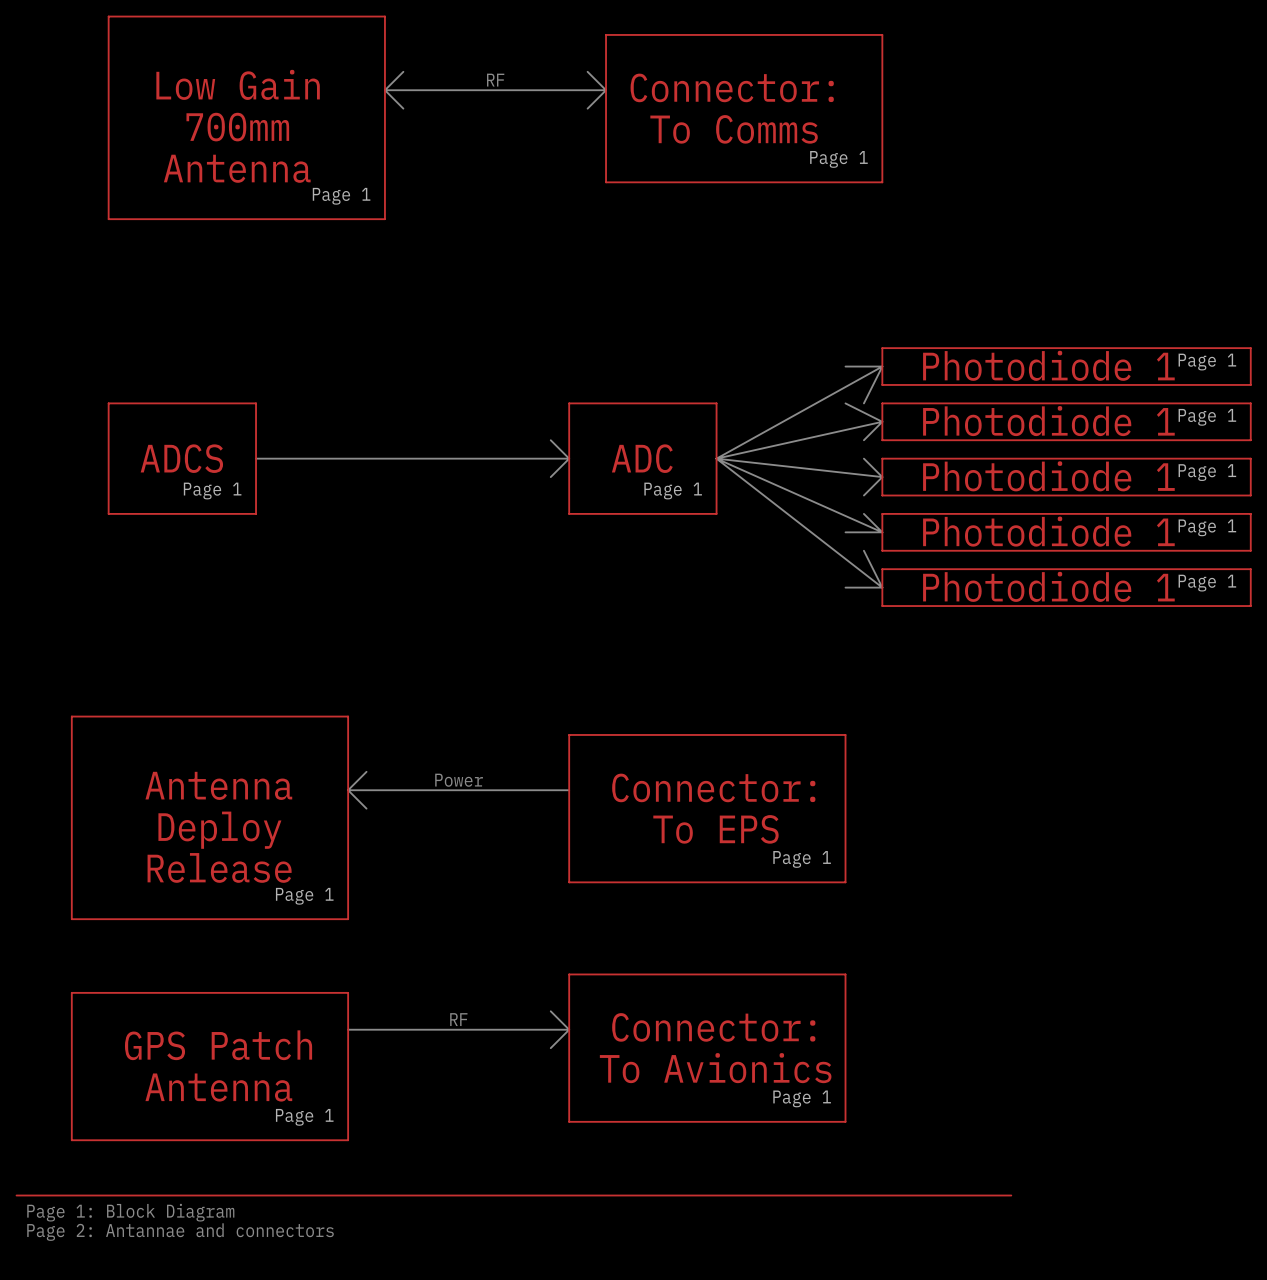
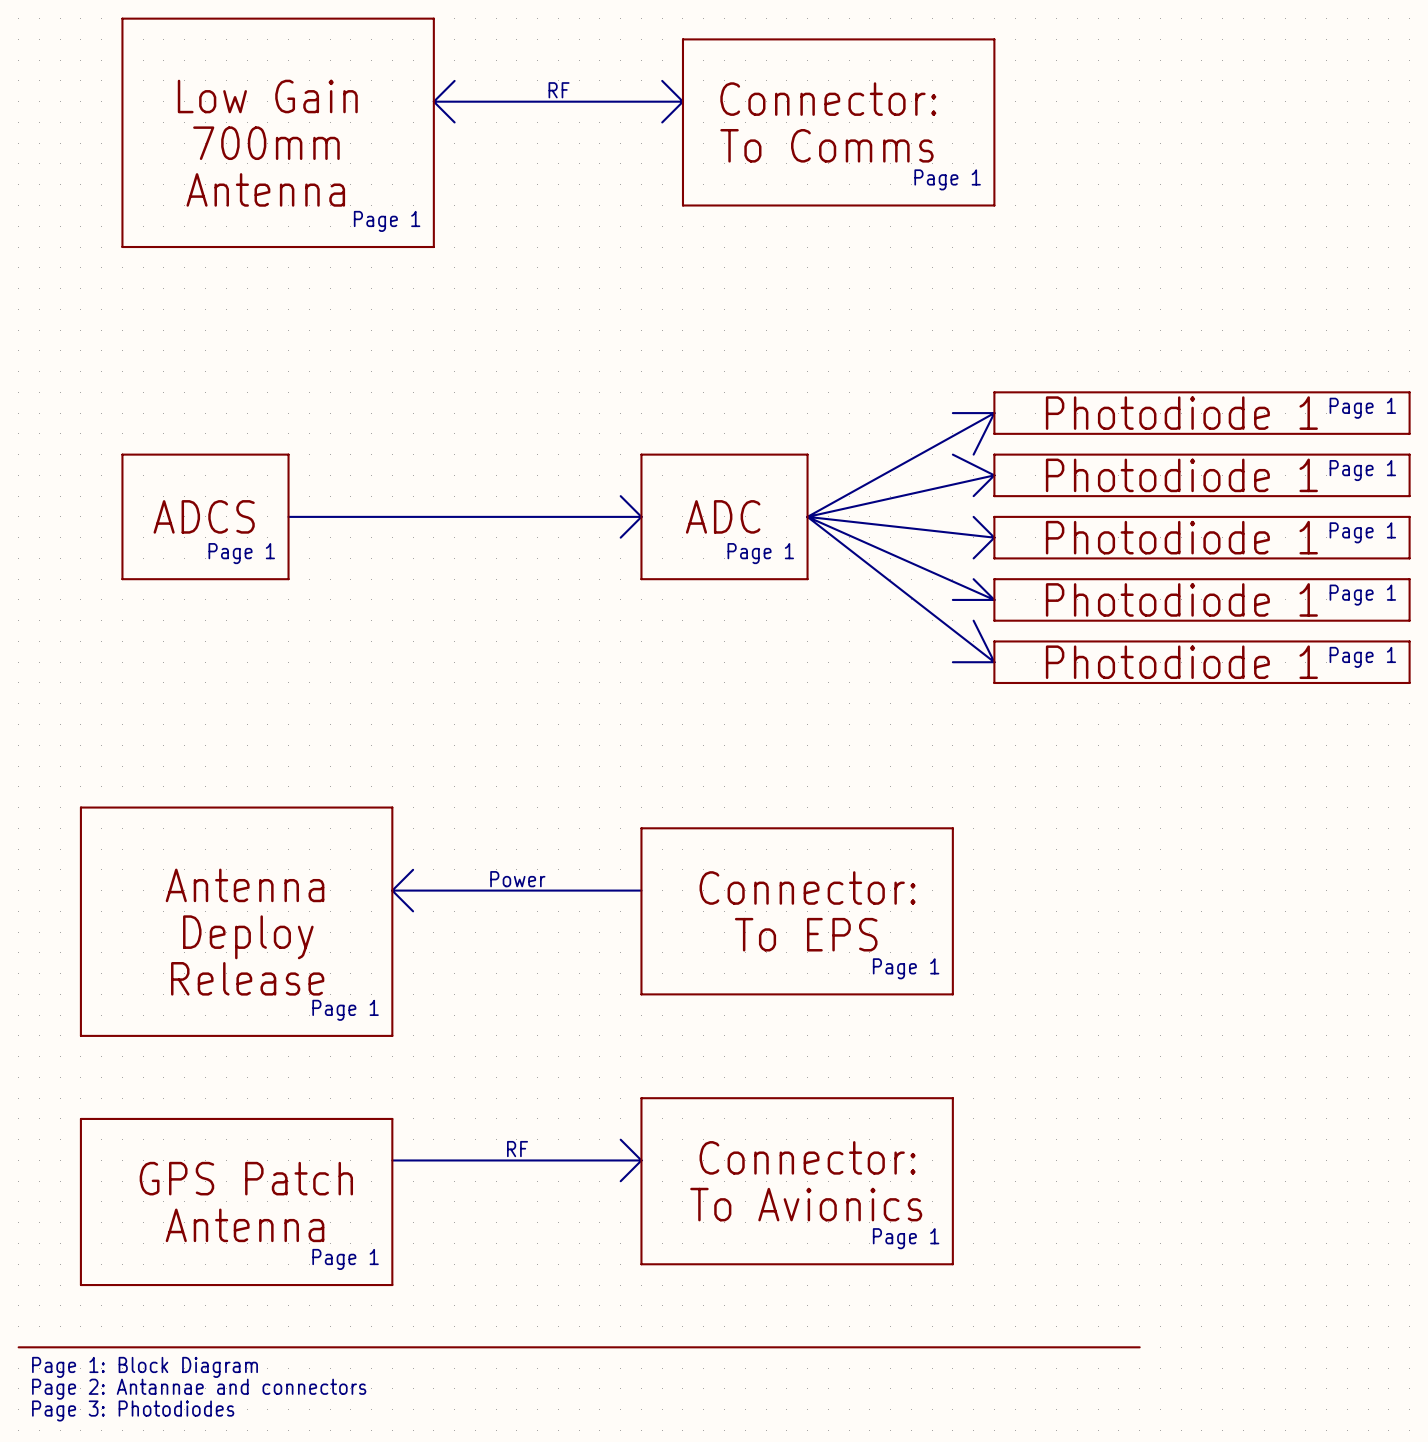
text: none -> Page 3: Photodiodes (133, 1410)

